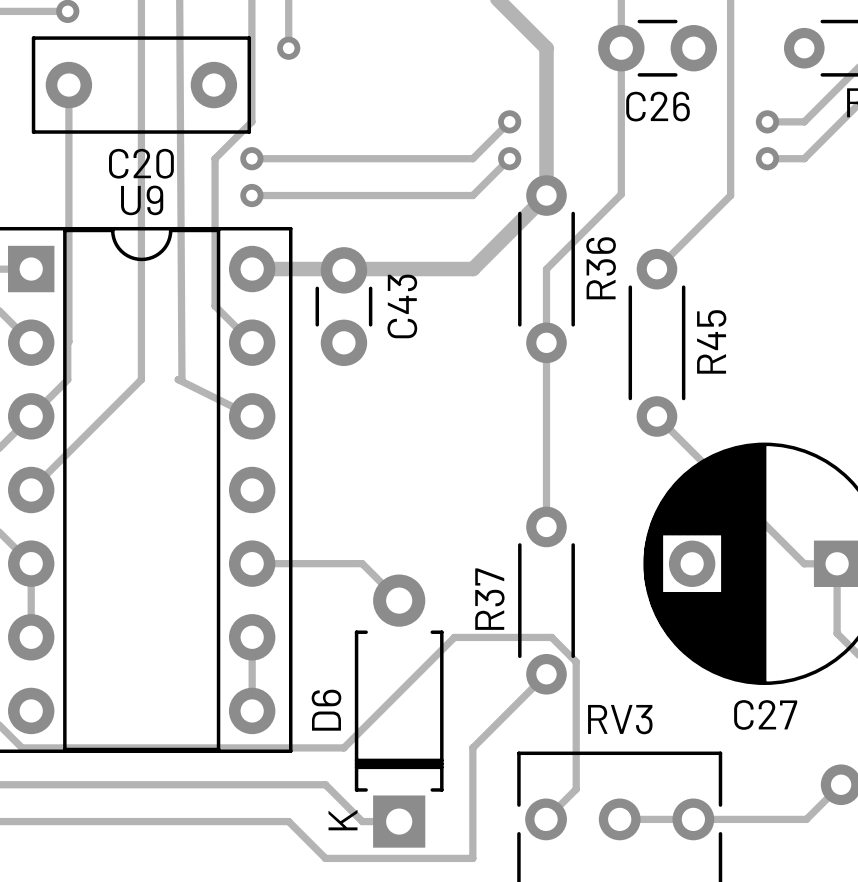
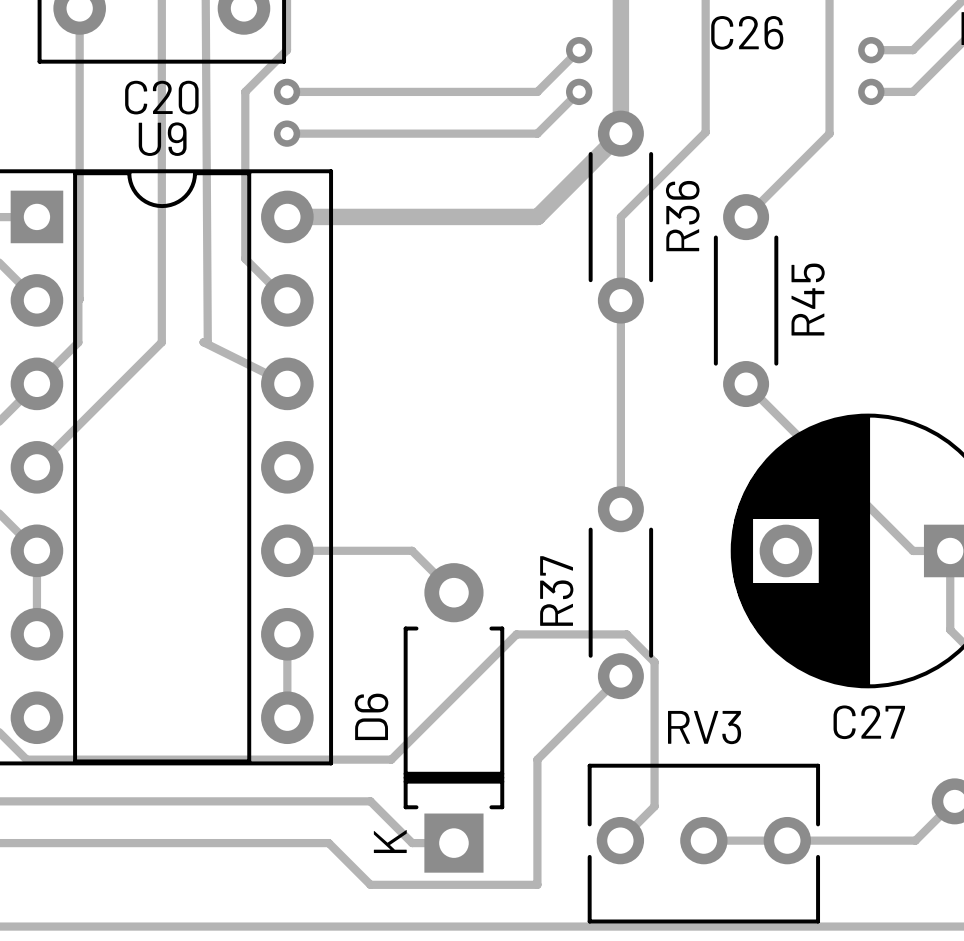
C43: (343, 306) -> none

